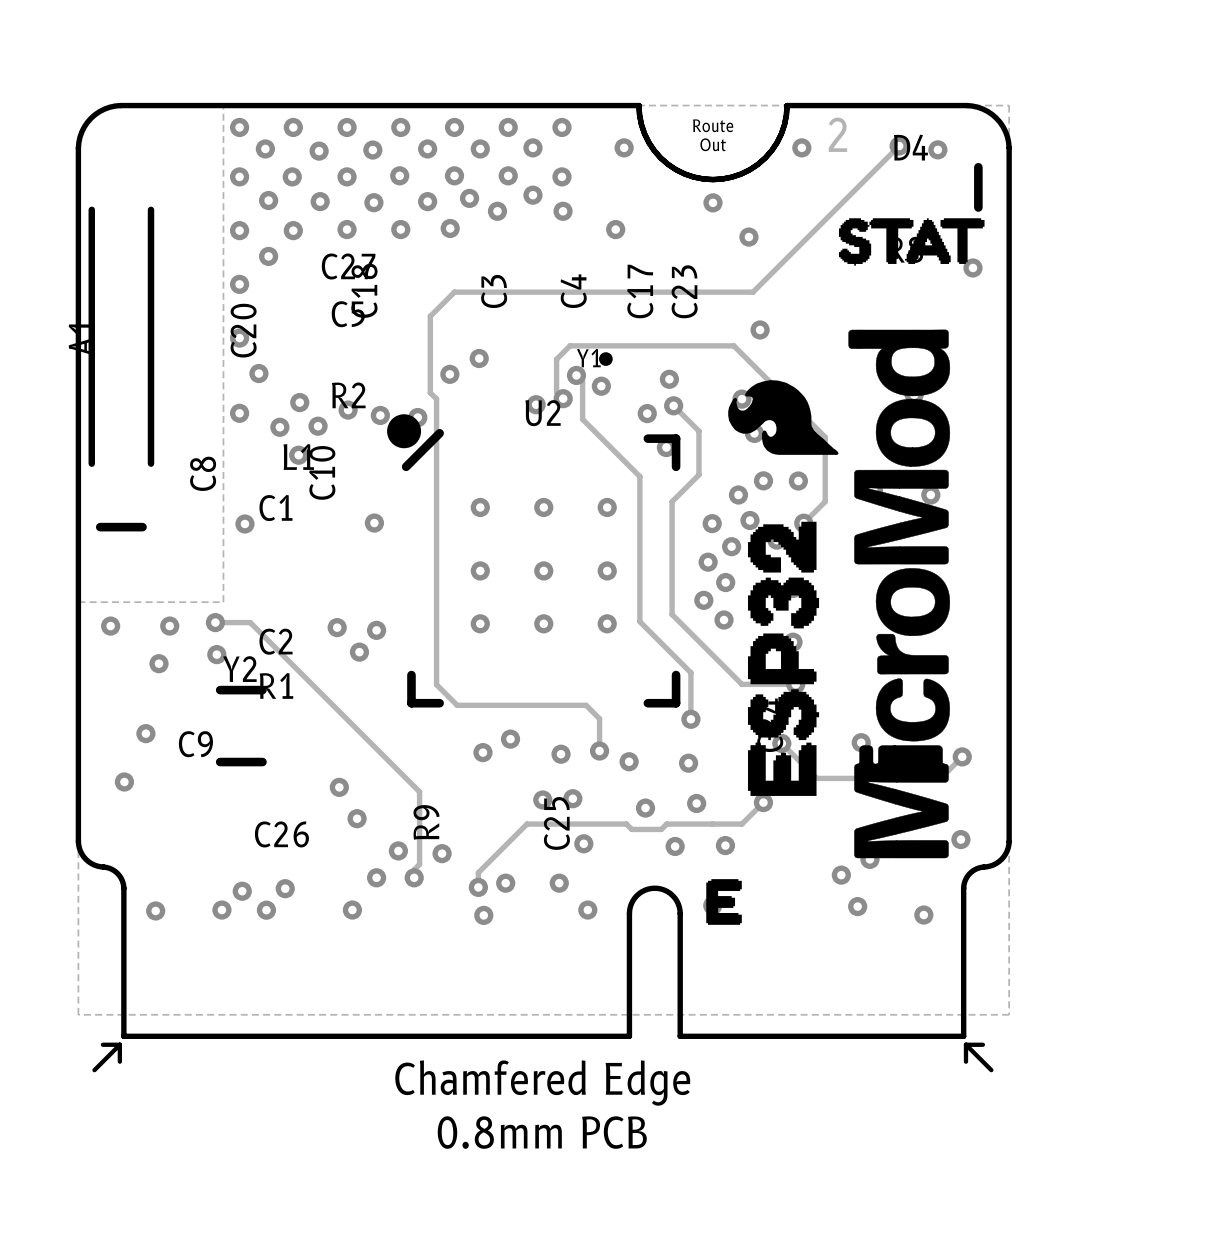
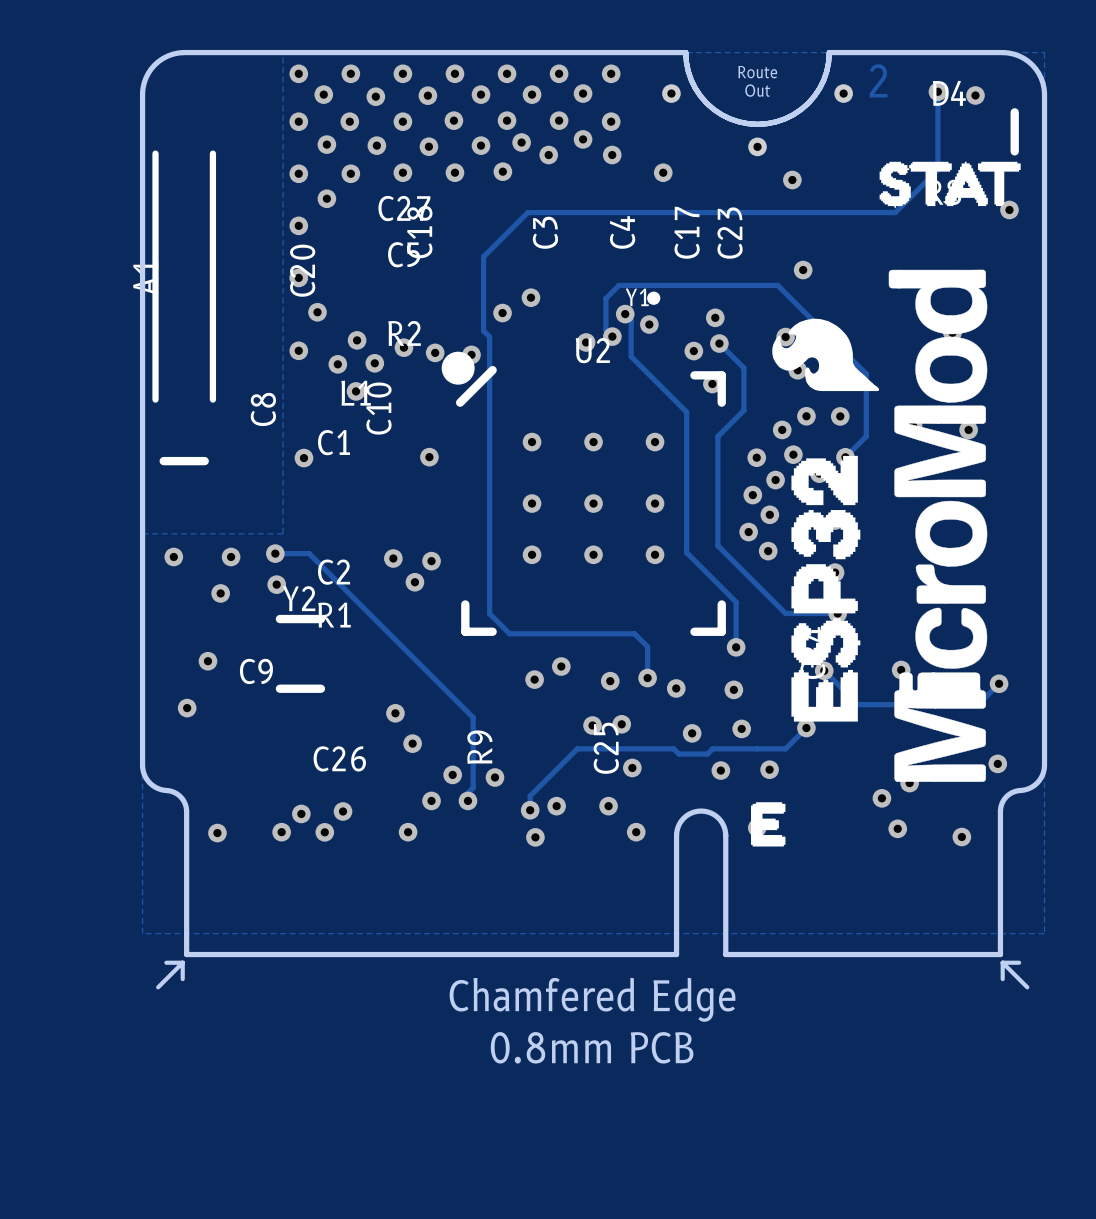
track: (899, 146) (753, 292) (454, 292) -> (937, 91) (937, 169) (895, 212) (527, 212) (507, 233)

